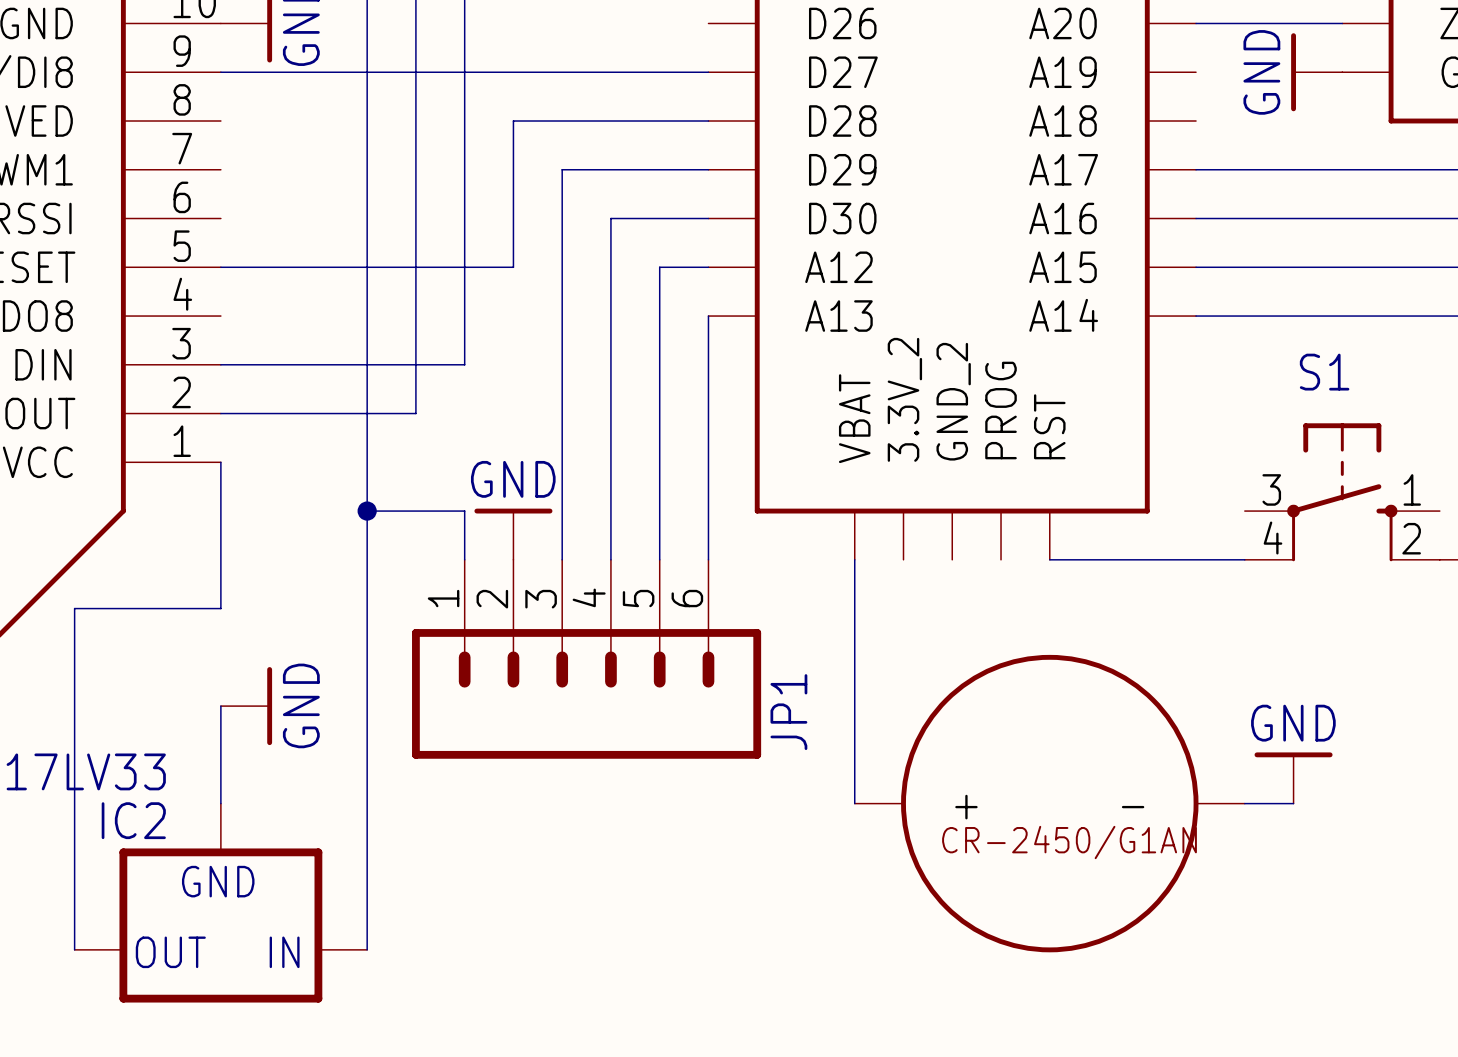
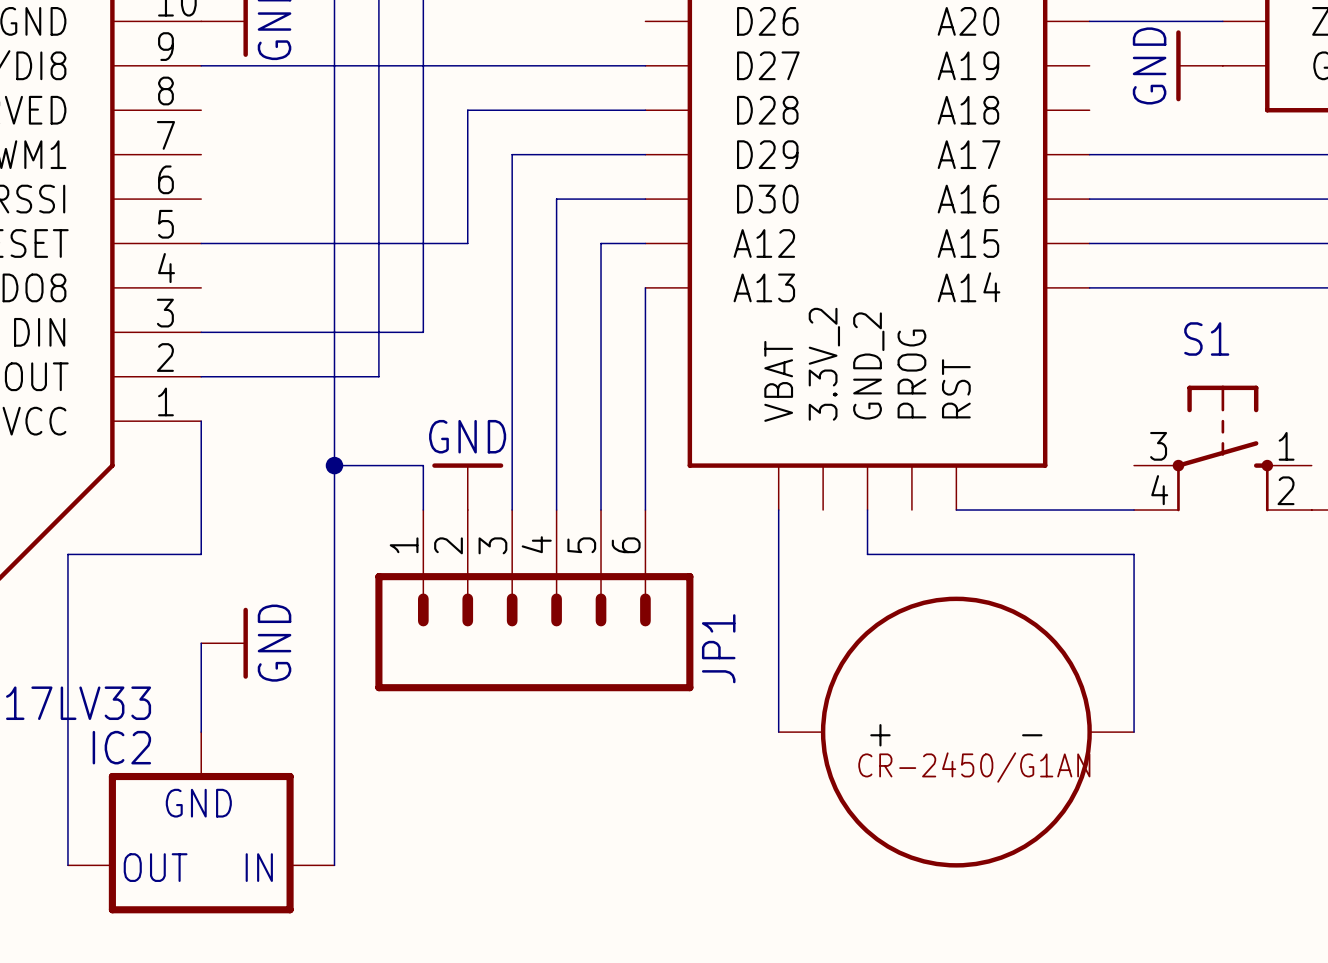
power symbol: GND (1293, 778) -> none
wire: (1244, 803) (1293, 803) -> (1134, 732) (1134, 554) (867, 554) (867, 510)

